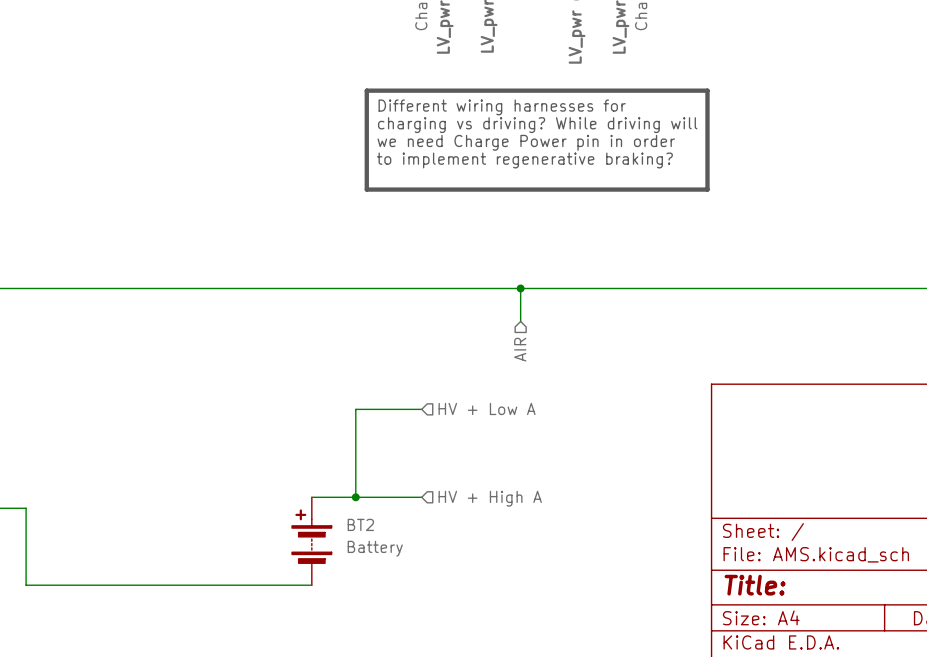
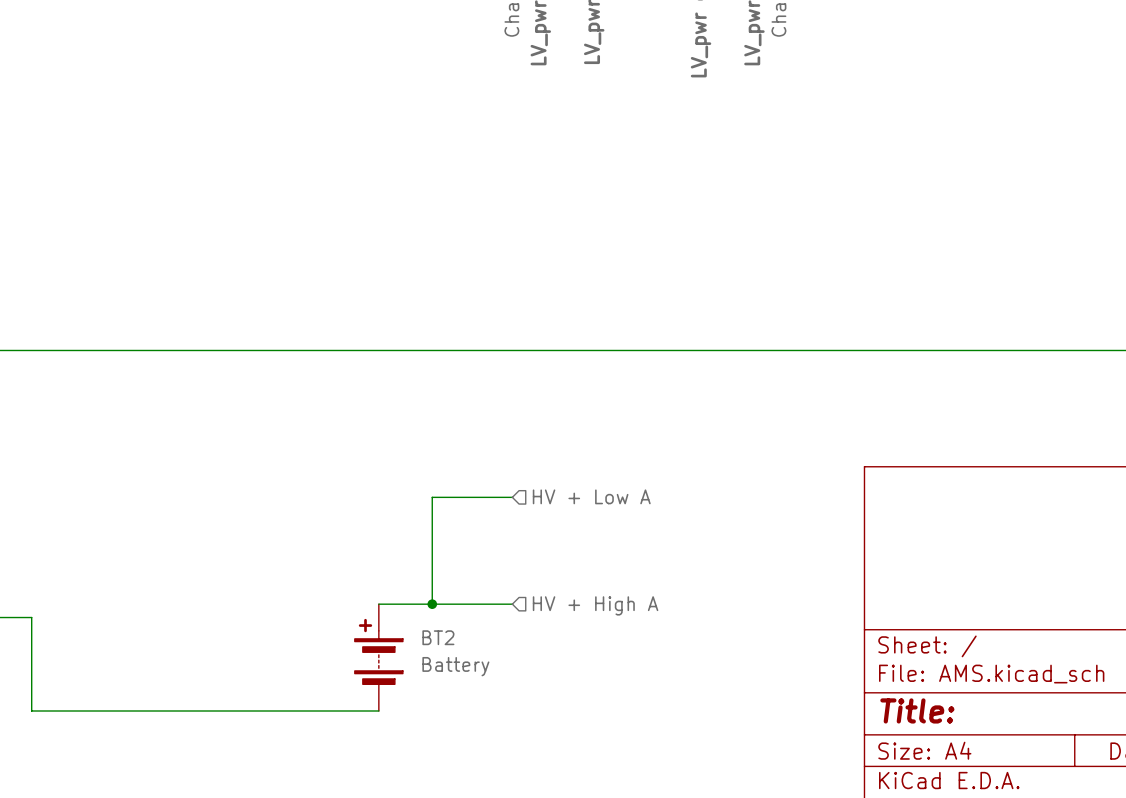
line: (366, 90) (707, 90) (707, 189) (366, 189) (366, 90) -> none
text: Different wiring harnesses for (502, 107) -> none
text: charging vs driving? While driving will (537, 125) -> none
text: we need Charge Power pin in order (526, 142) -> none
text: to implement regenerative braking? (524, 160) -> none
wire: (520, 288) (520, 321) -> none
junction: (520, 288) -> none
hierarchical label: AIR (520, 349) -> none

